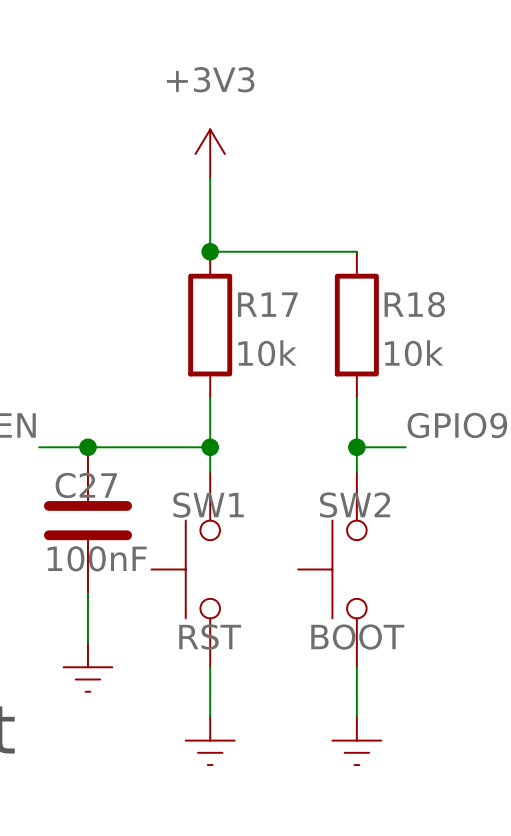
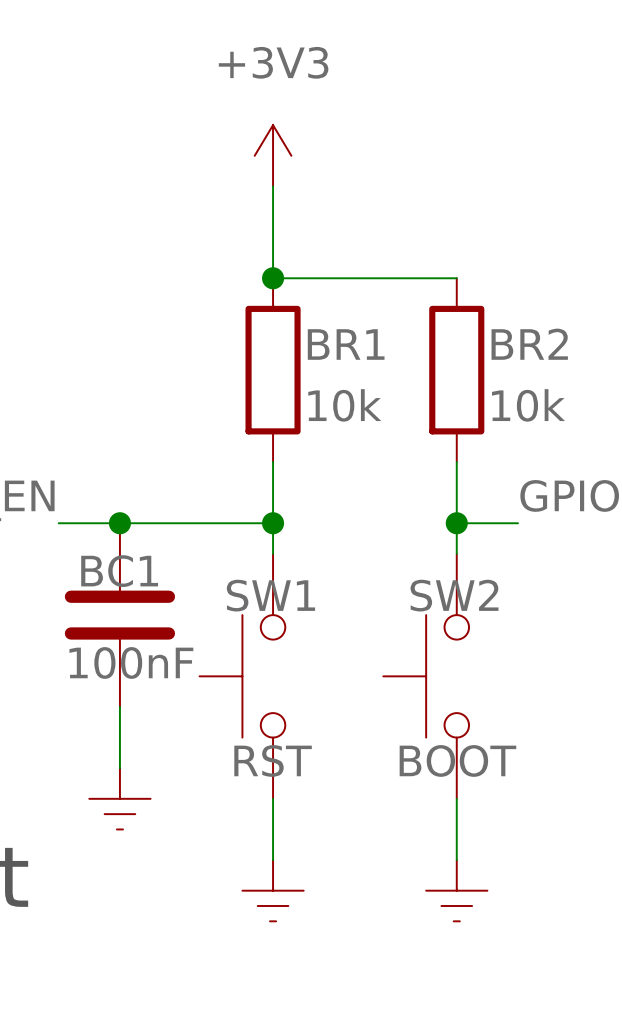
R17 name: R17 (267, 304) -> BR1 (346, 344)
R18 name: R18 (414, 304) -> BR2 (529, 344)
C27 name: C27 (86, 485) -> BC1 (119, 571)

